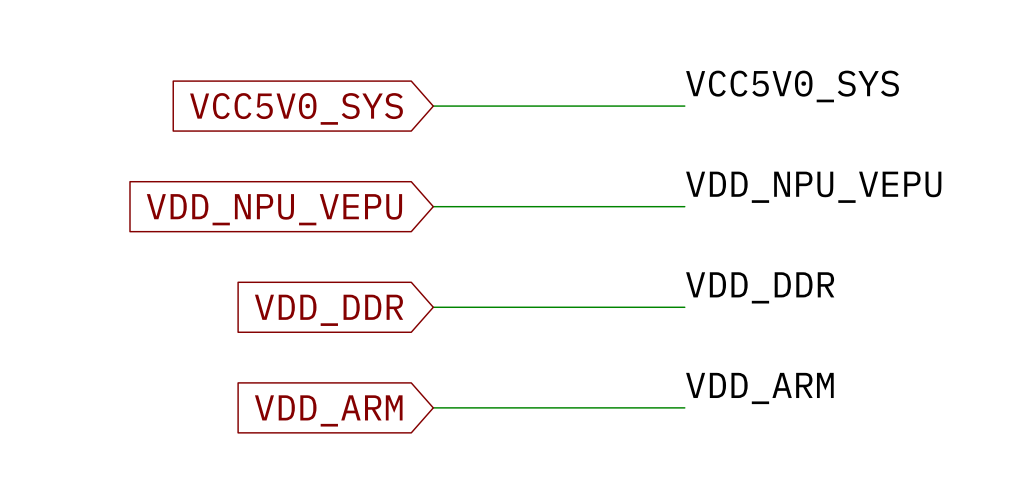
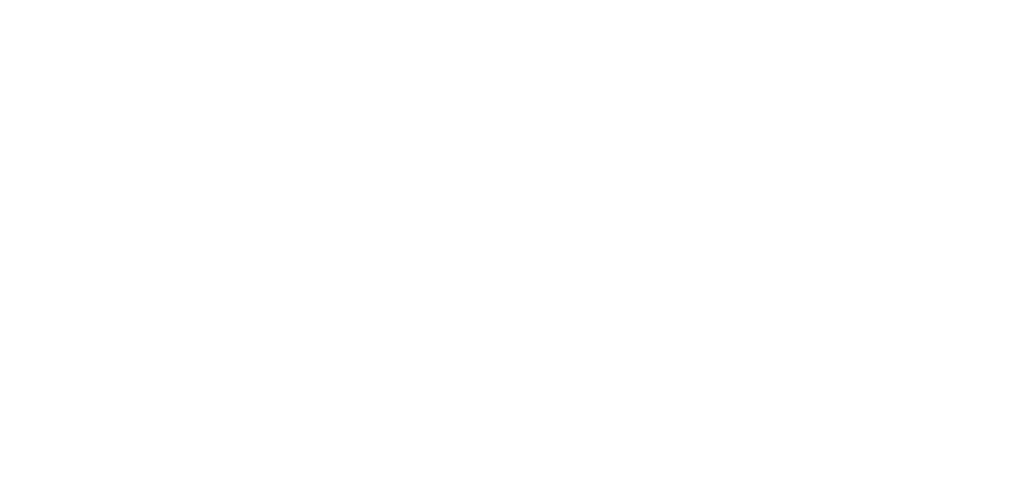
label: VCC5V0_SYS (792, 86) -> none
wire: (433, 106) (684, 106) -> none
global label: VCC5V0_SYS (296, 108) -> none
label: VDD_NPU_VEPU (813, 187) -> none
wire: (433, 206) (684, 206) -> none
global label: VDD_NPU_VEPU (274, 209) -> none
label: VDD_DDR (760, 287) -> none
wire: (433, 307) (684, 307) -> none
global label: VDD_DDR (329, 310) -> none
label: VDD_ARM (759, 388) -> none
wire: (433, 407) (684, 407) -> none
global label: VDD_ARM (328, 410) -> none

